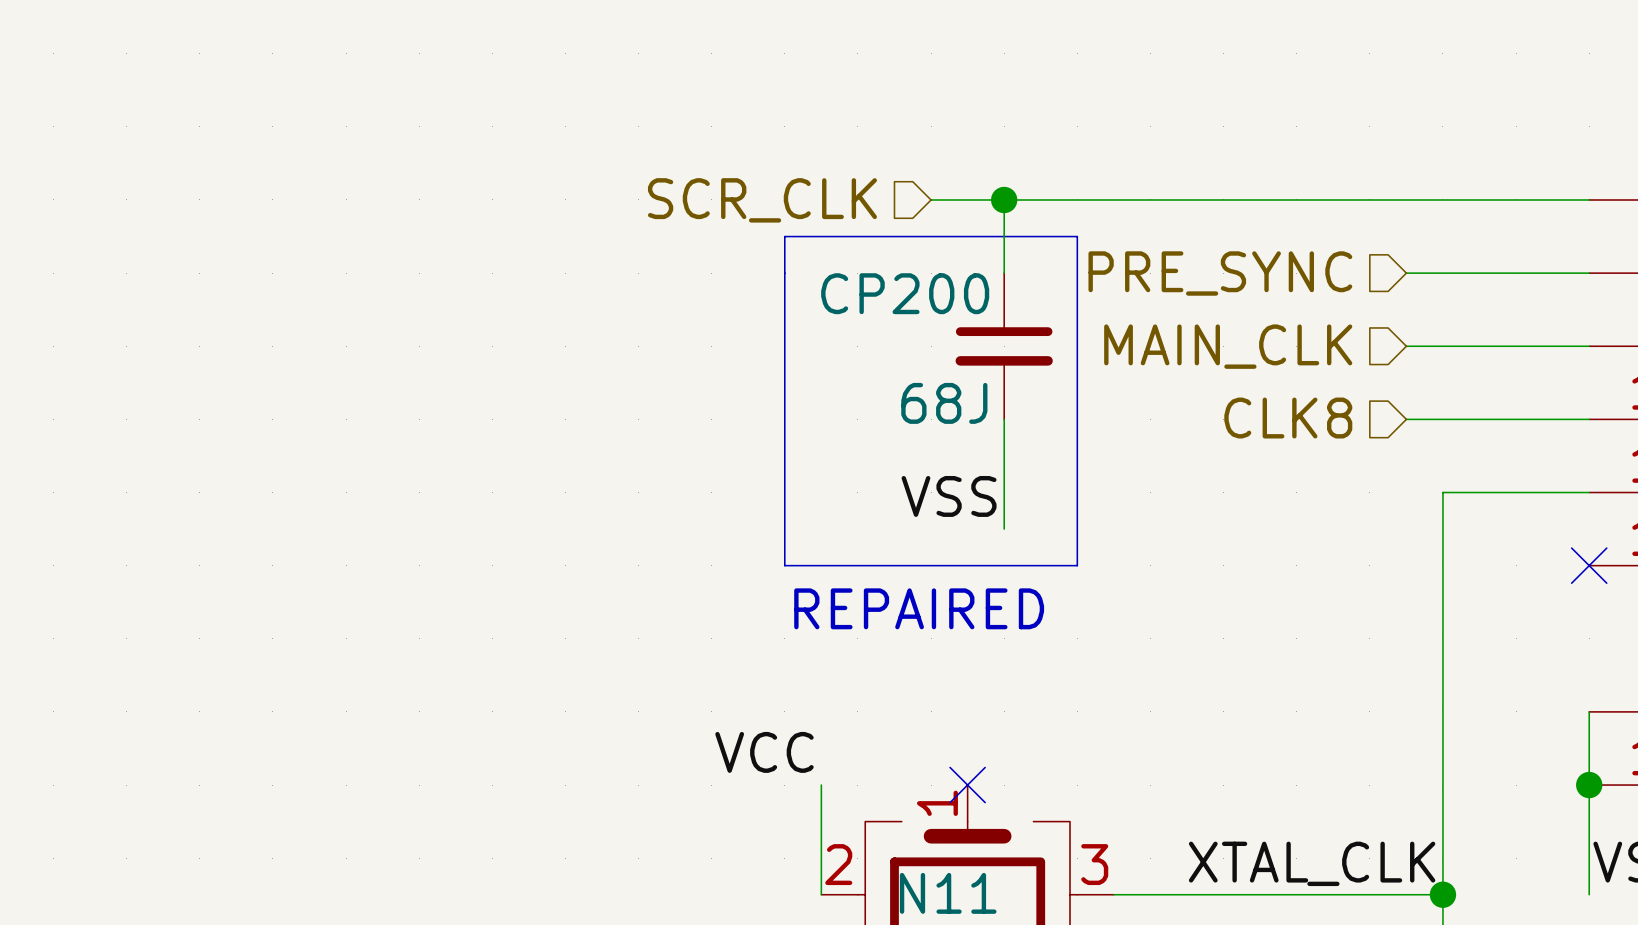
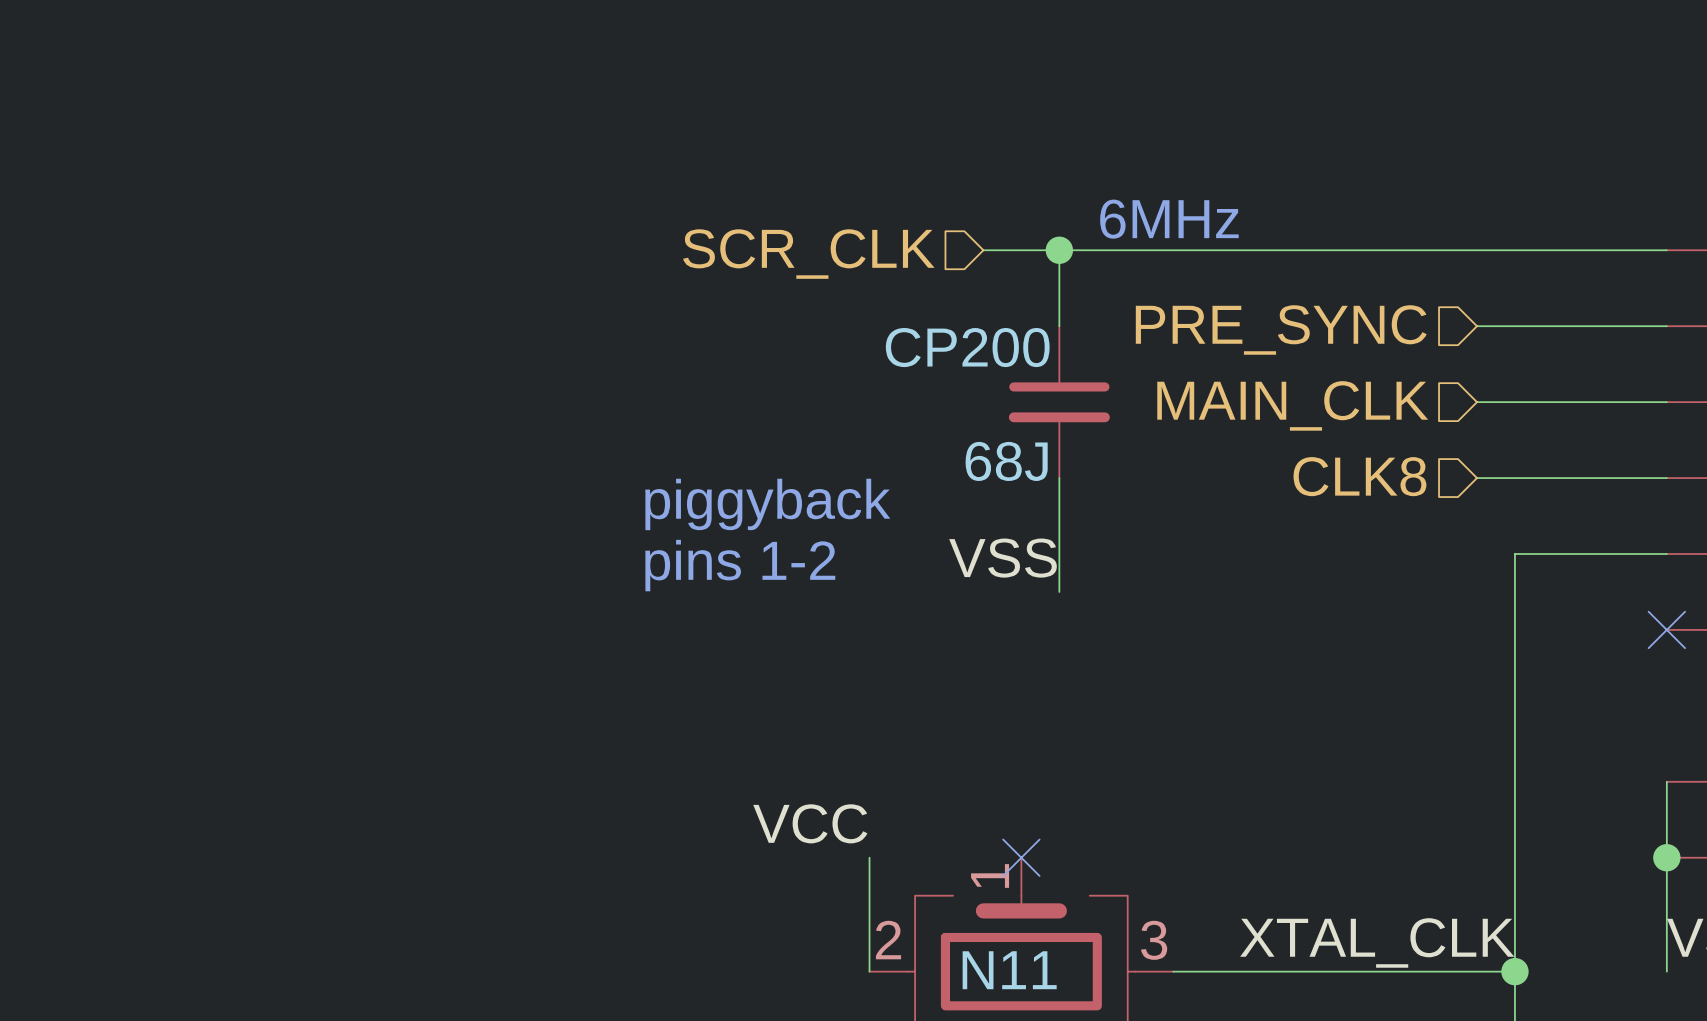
text: none -> 6MHz (1169, 219)
line: (784, 236) (784, 565) (1077, 565) (1077, 236) (784, 236) -> none
text: none -> piggyback (767, 504)
text: none -> pins 1-2 (740, 565)
text: REPAIRED (919, 608) -> none

